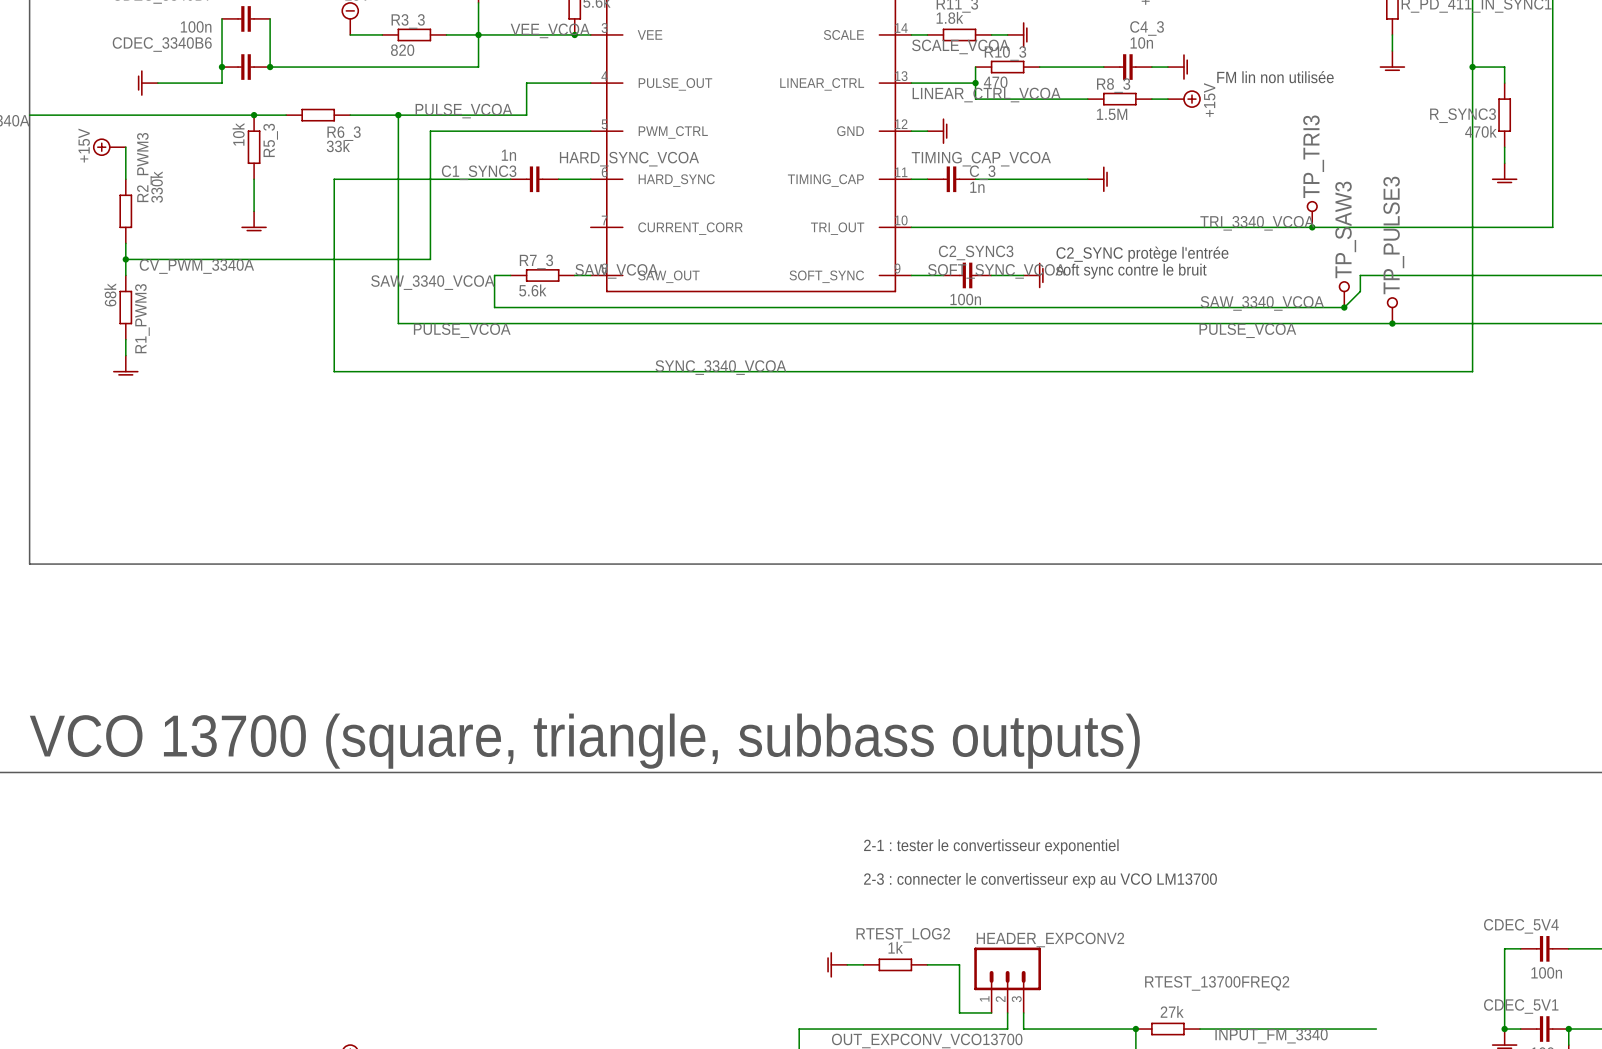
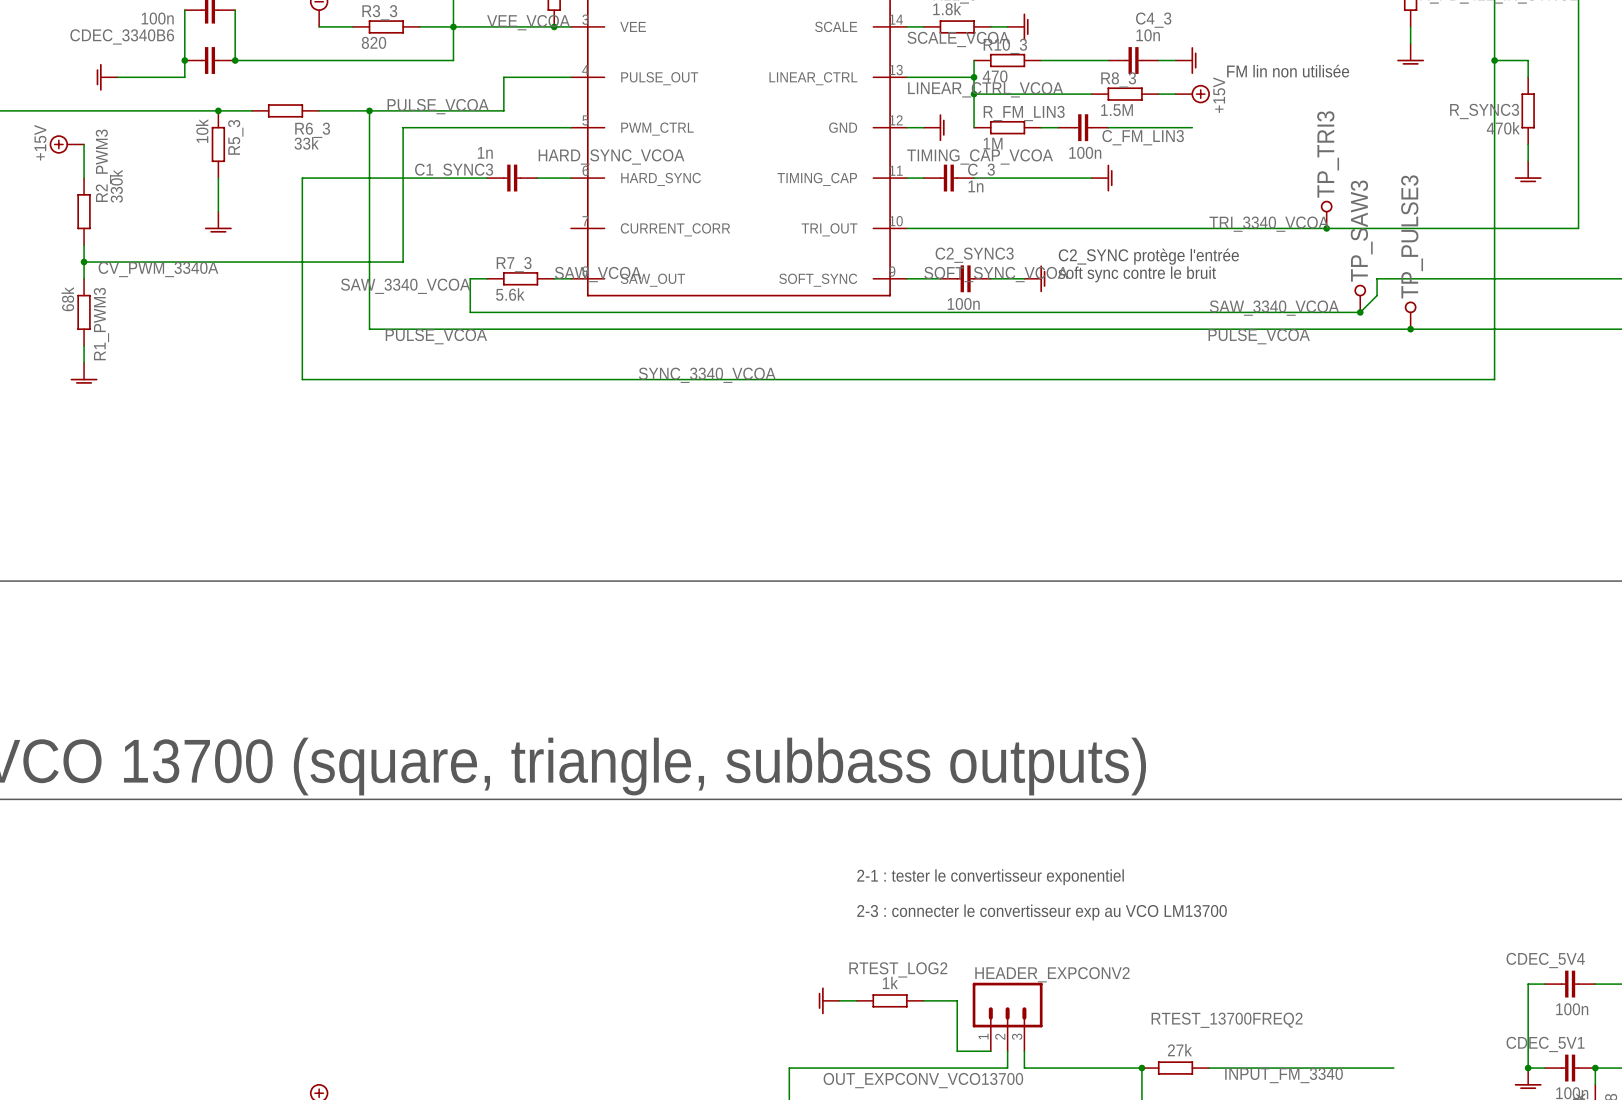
wire: none -> (974, 94) (974, 127)
junction: none -> (974, 94)
R_FM_LIN3: none -> 1M (1007, 127)
wire: none -> (1041, 127) (1057, 127)
C_FM_LIN3: none -> 100n (1083, 127)
wire: none -> (1108, 127) (1192, 127)

